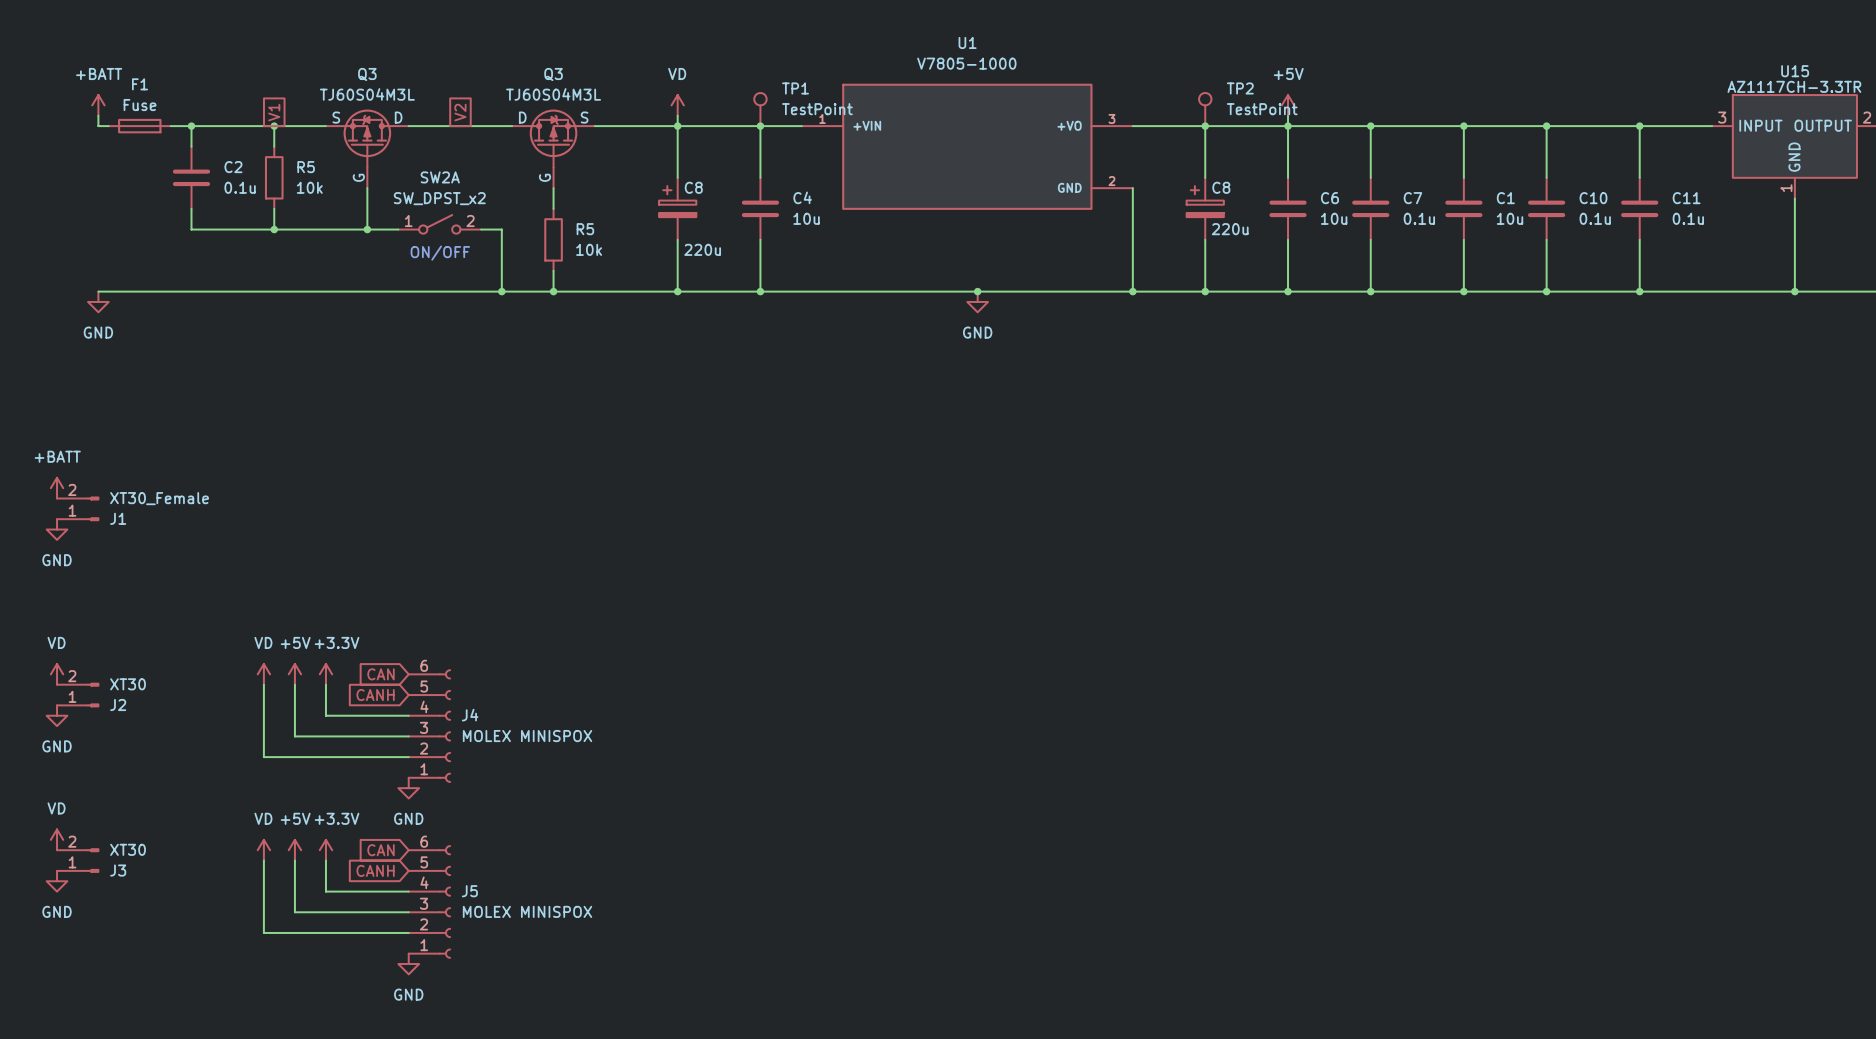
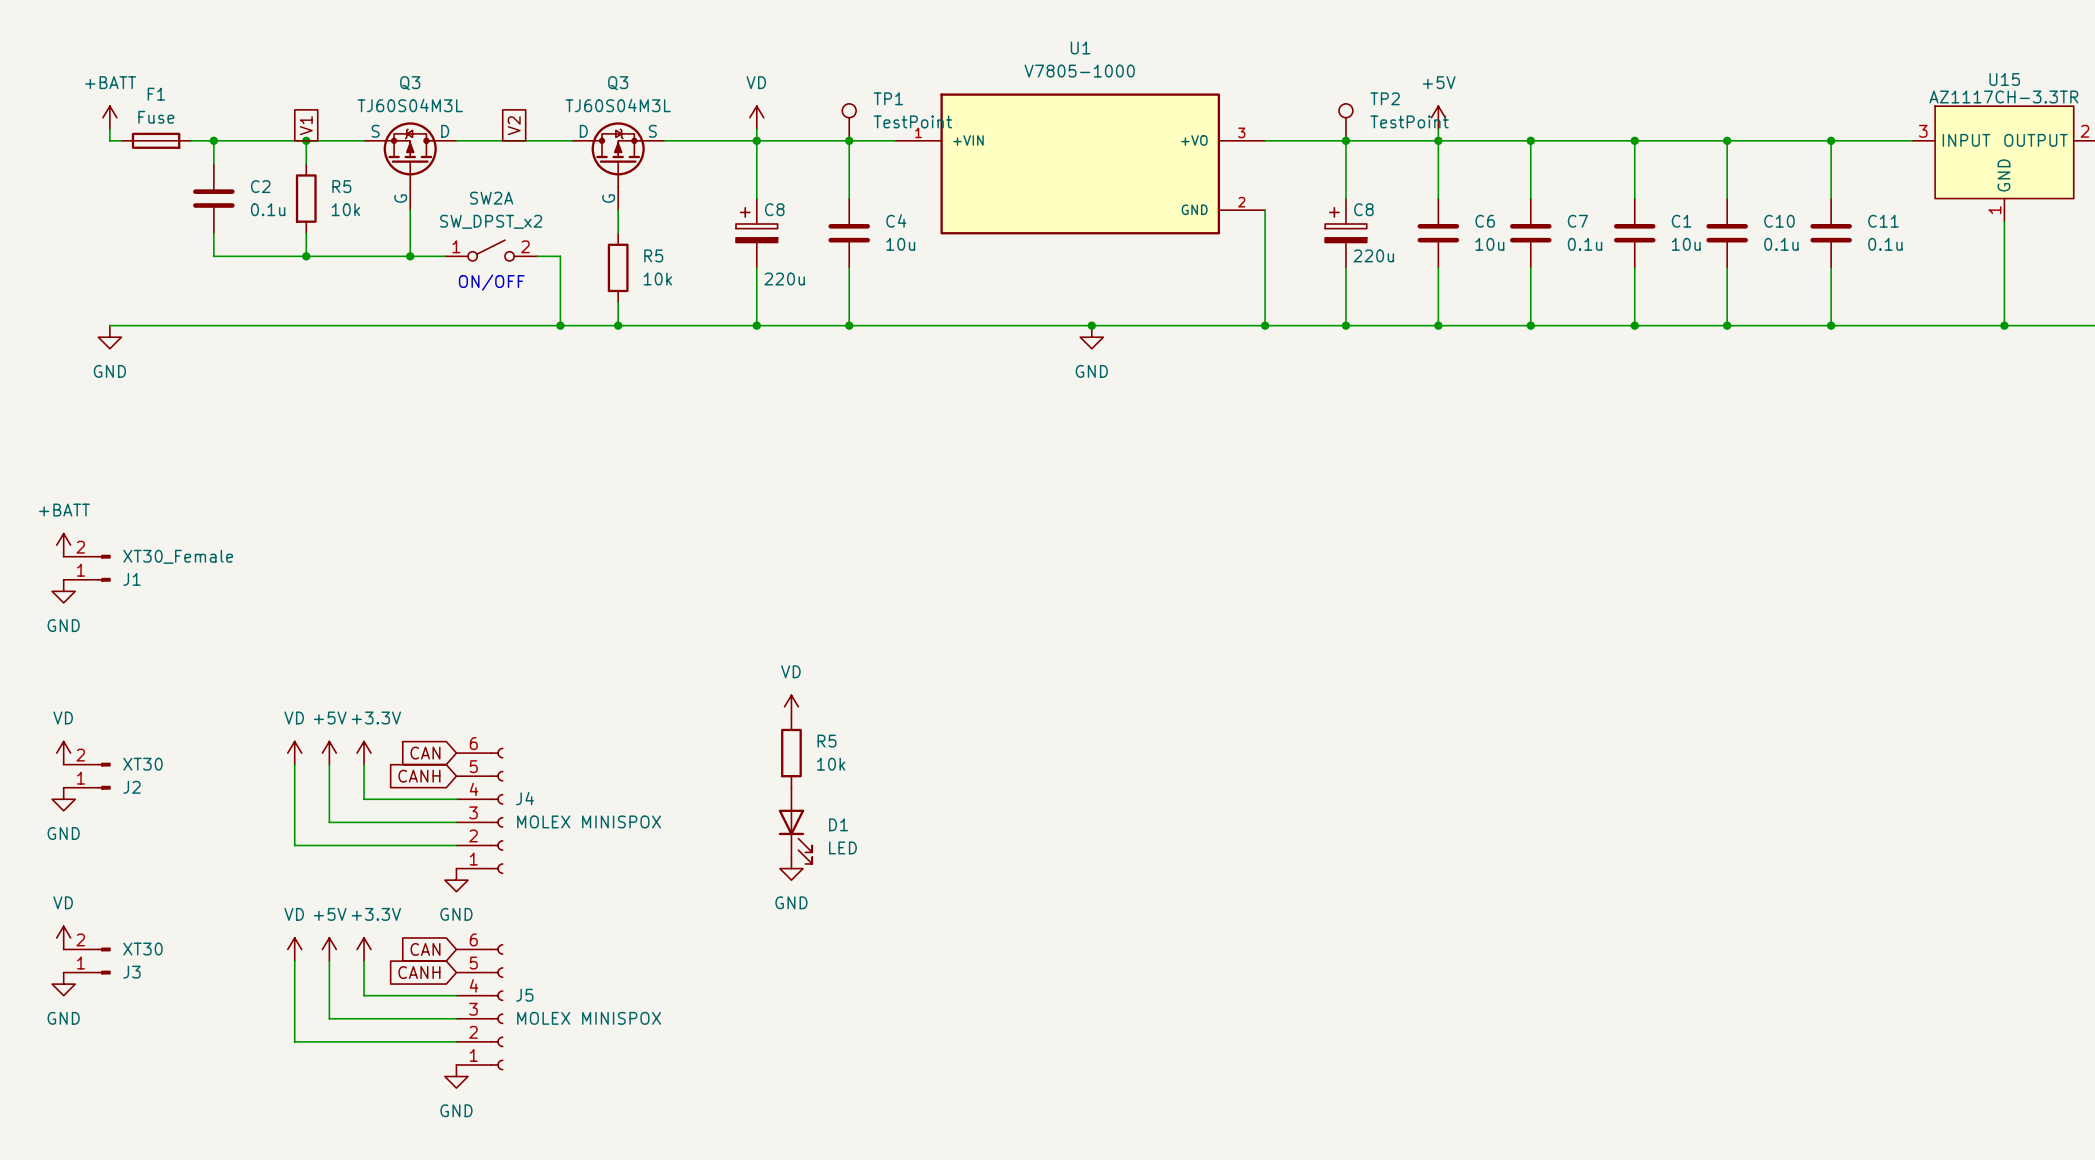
power symbol: none -> VD (791, 706)
R5: none -> 10k (791, 753)
D1: none -> LED (795, 825)
power symbol: none -> GND (791, 868)

